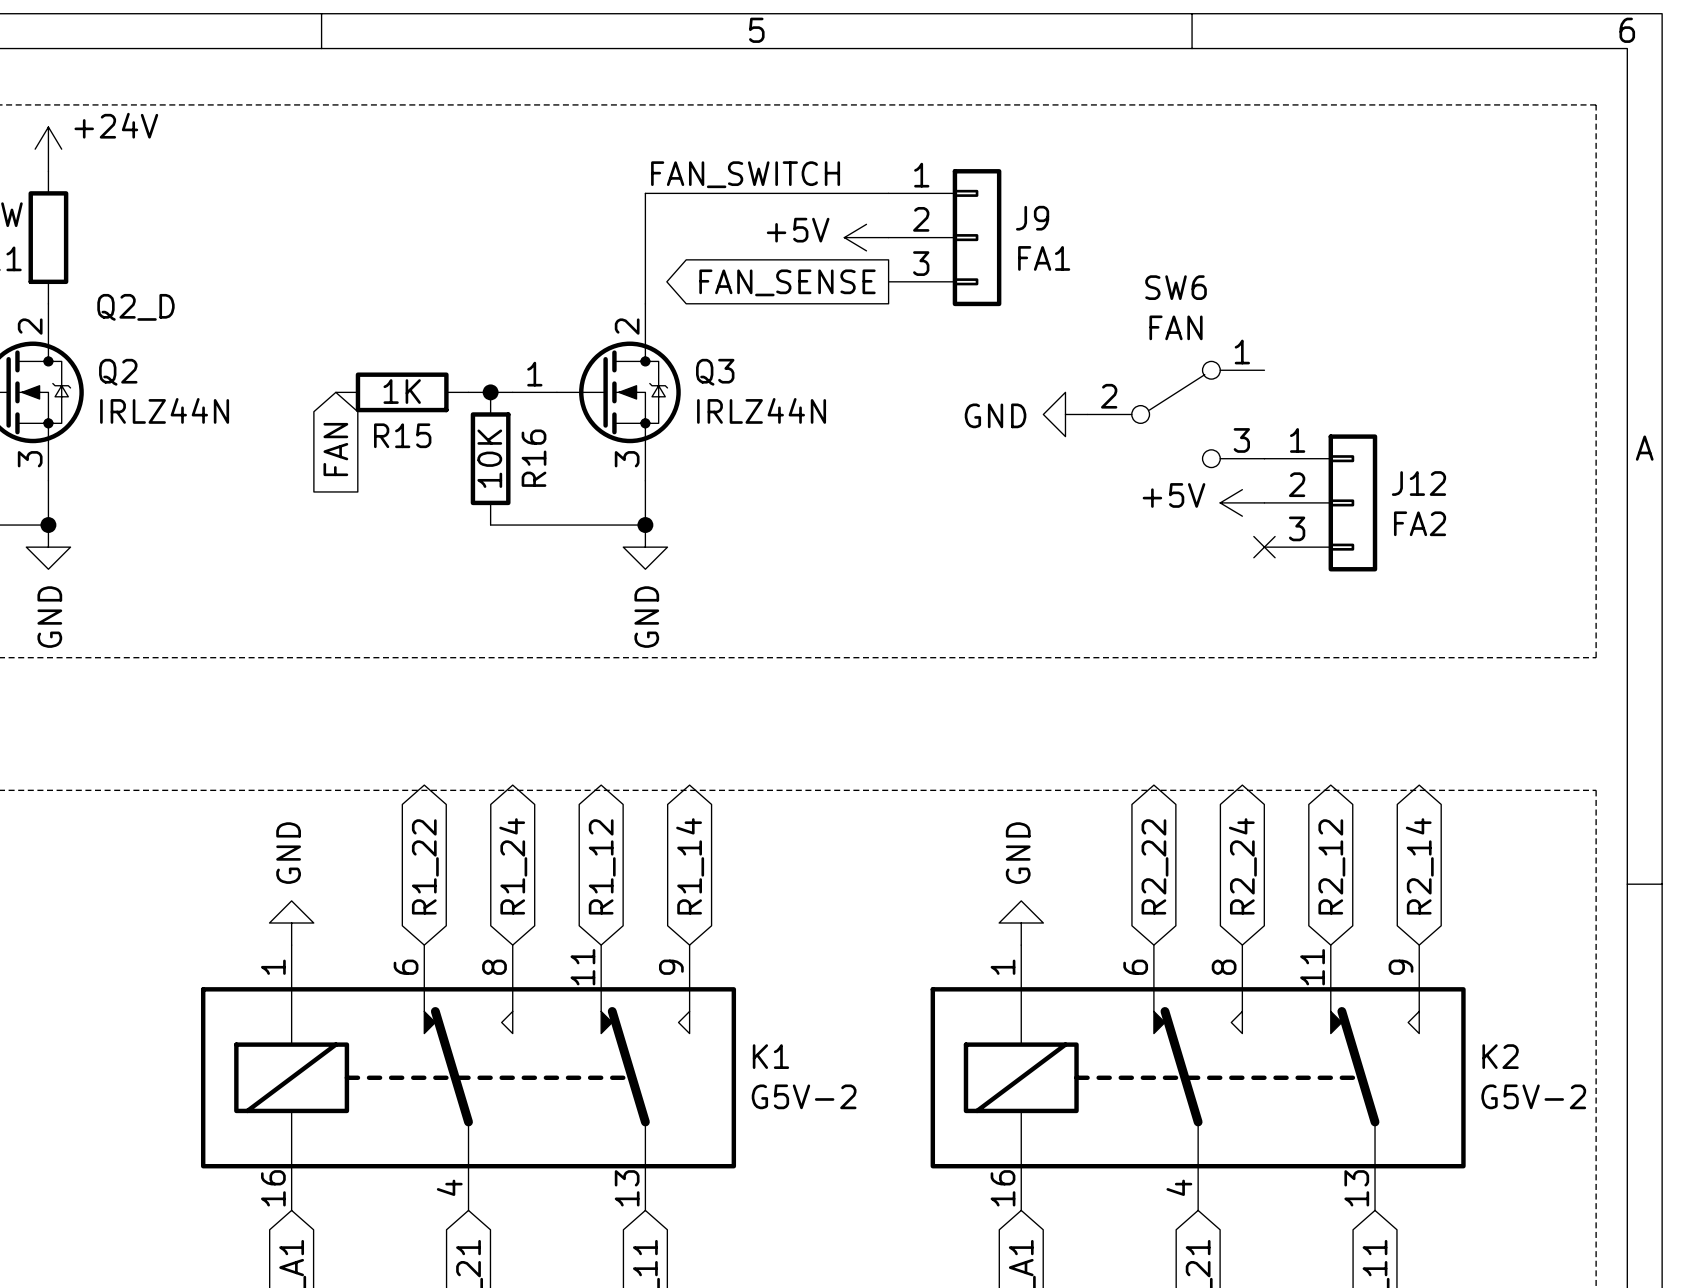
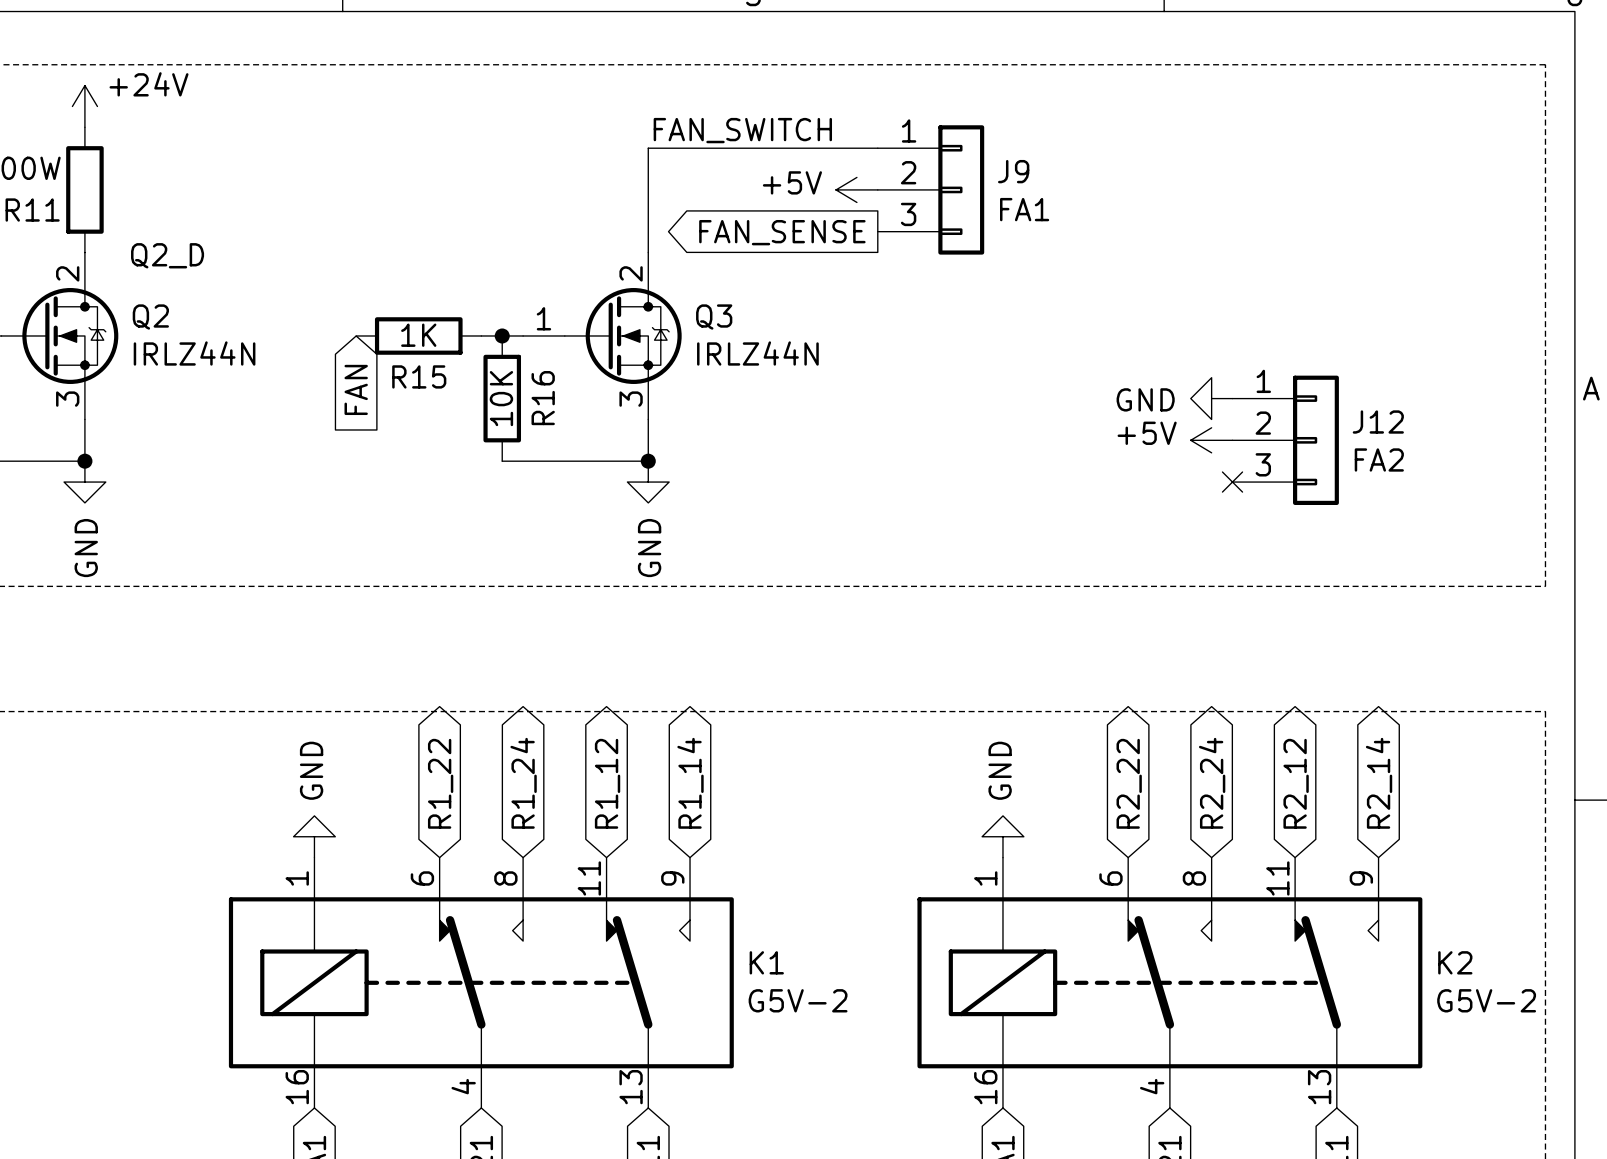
power symbol position: GND (1065, 414) -> GND (1211, 398)
SW6: FAN (1176, 414) -> none

